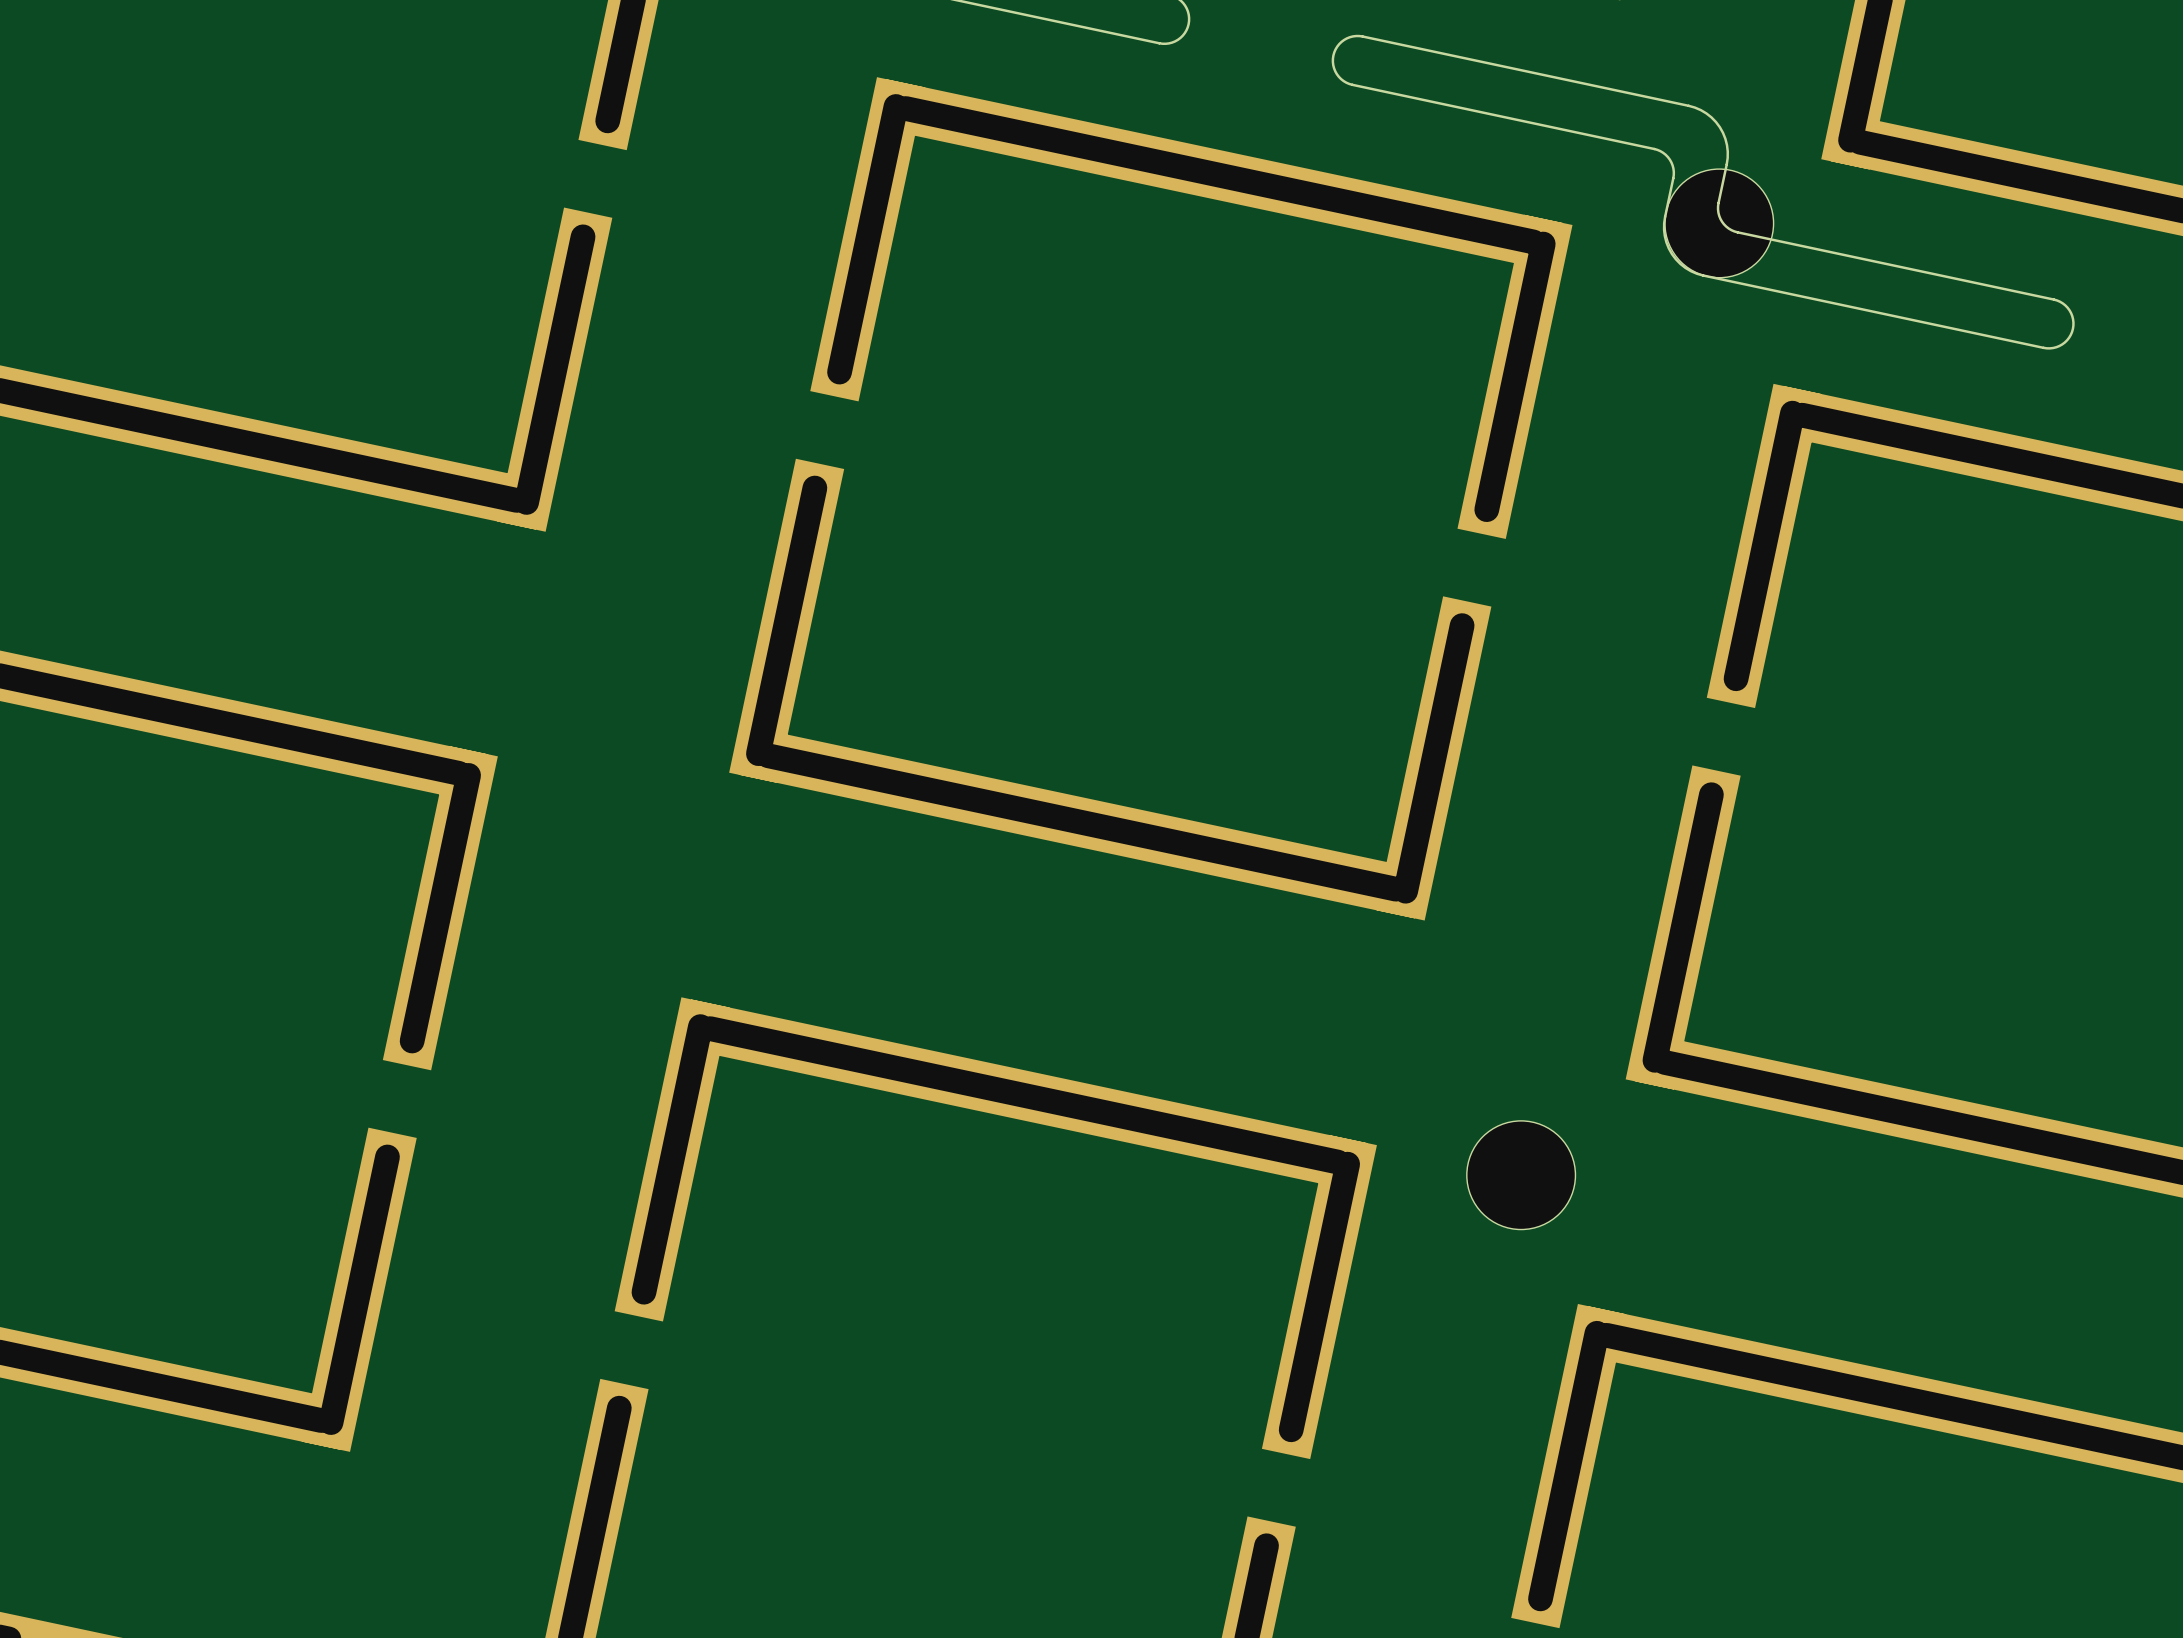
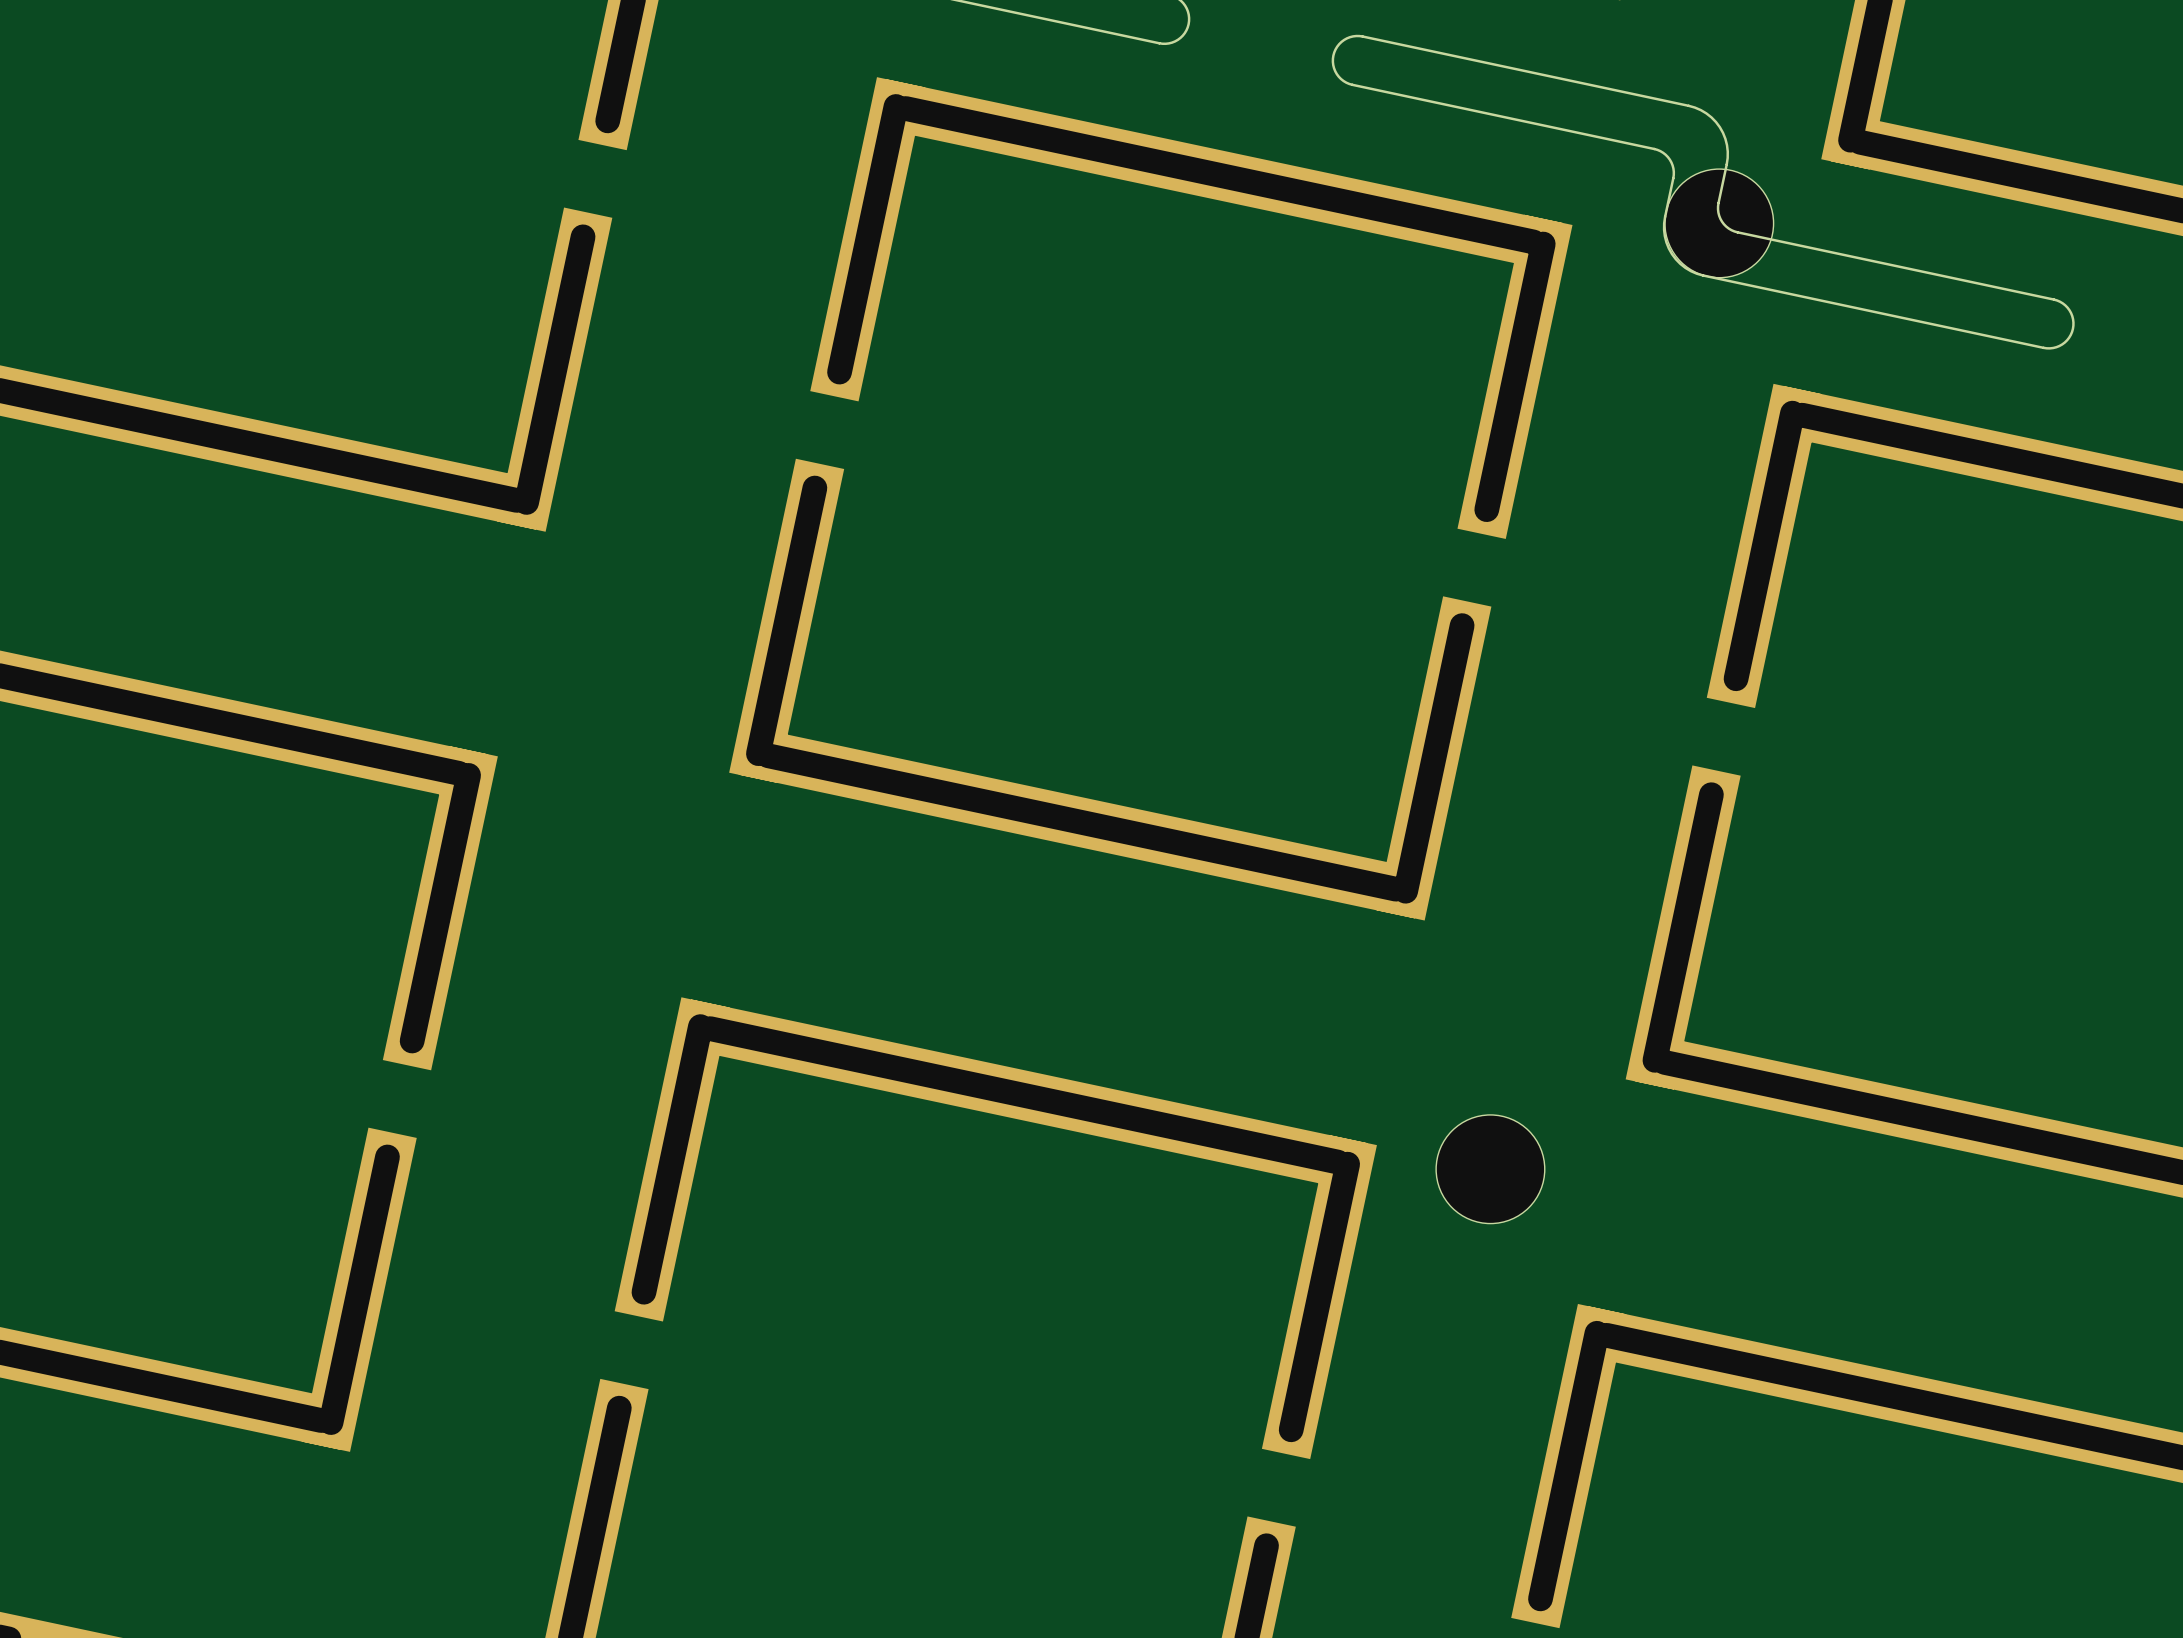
part position: (1521, 1175) -> (1490, 1169)

